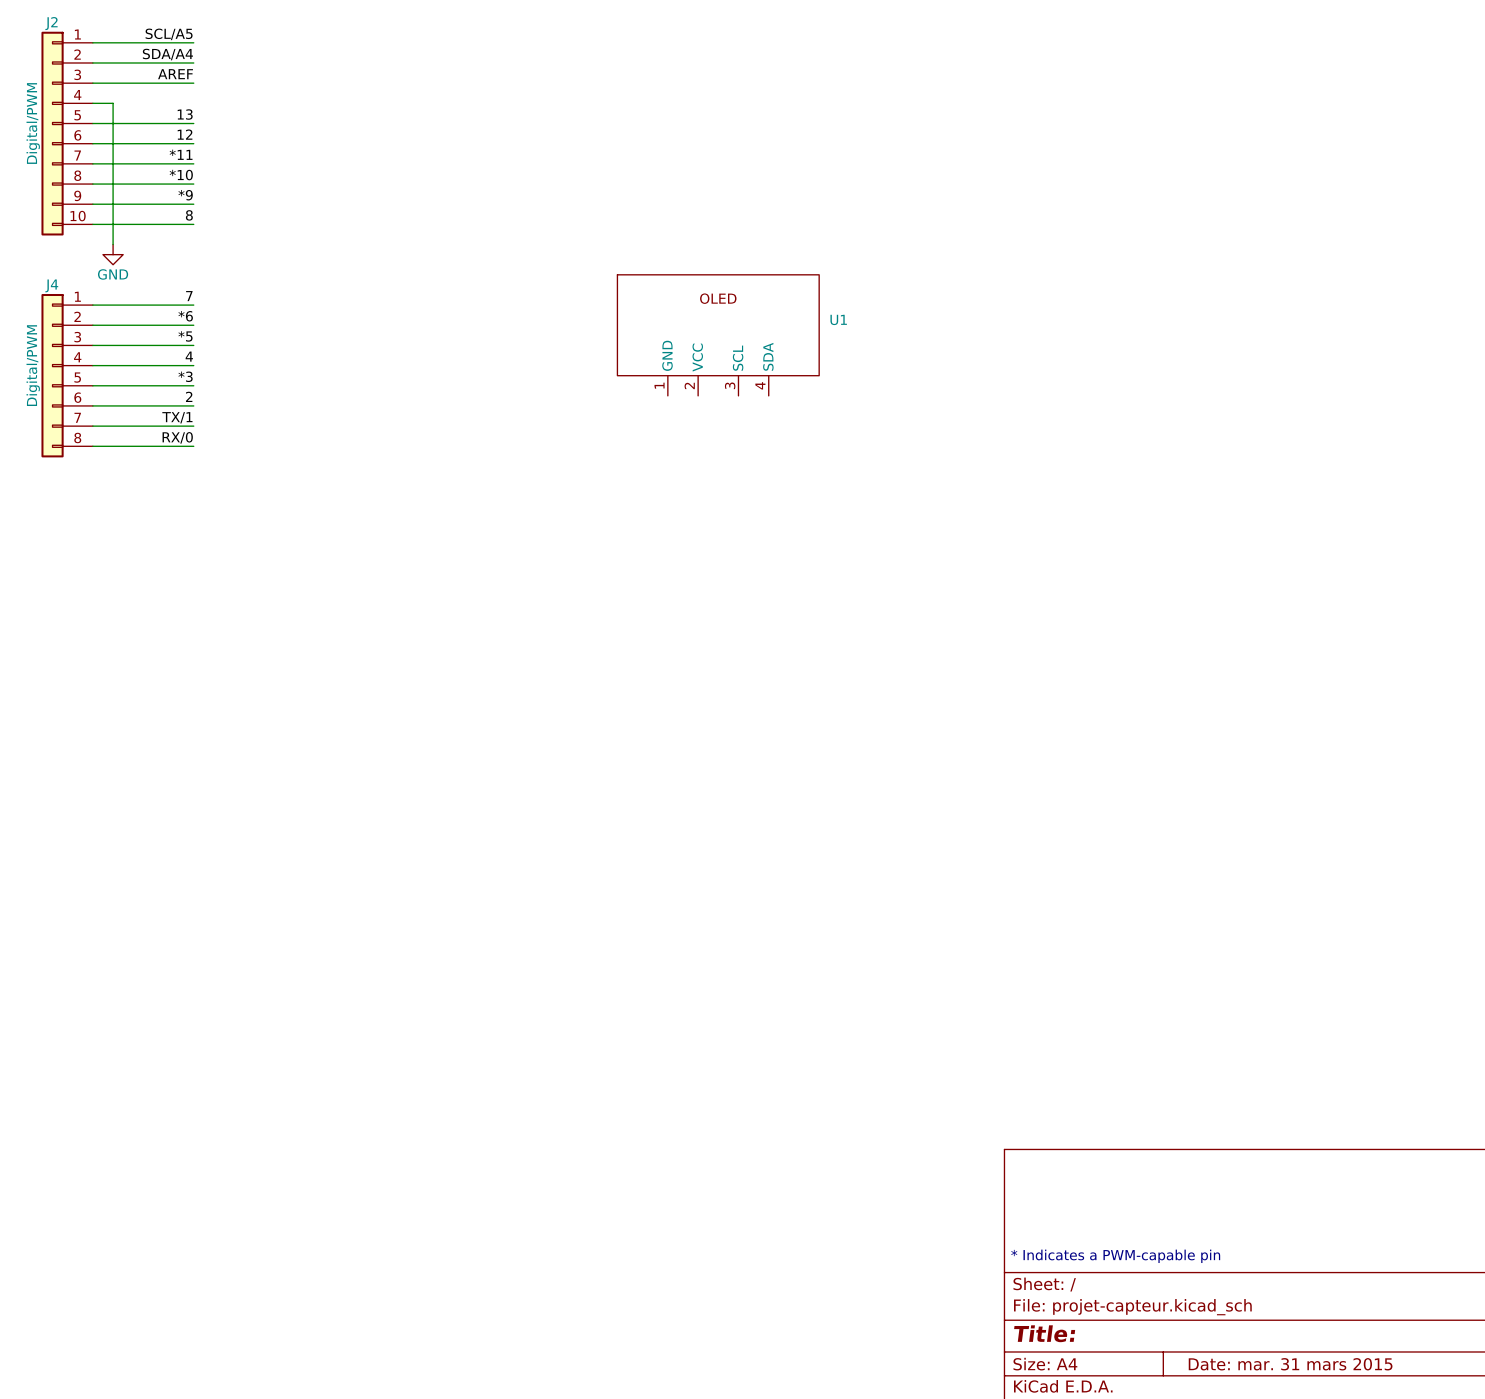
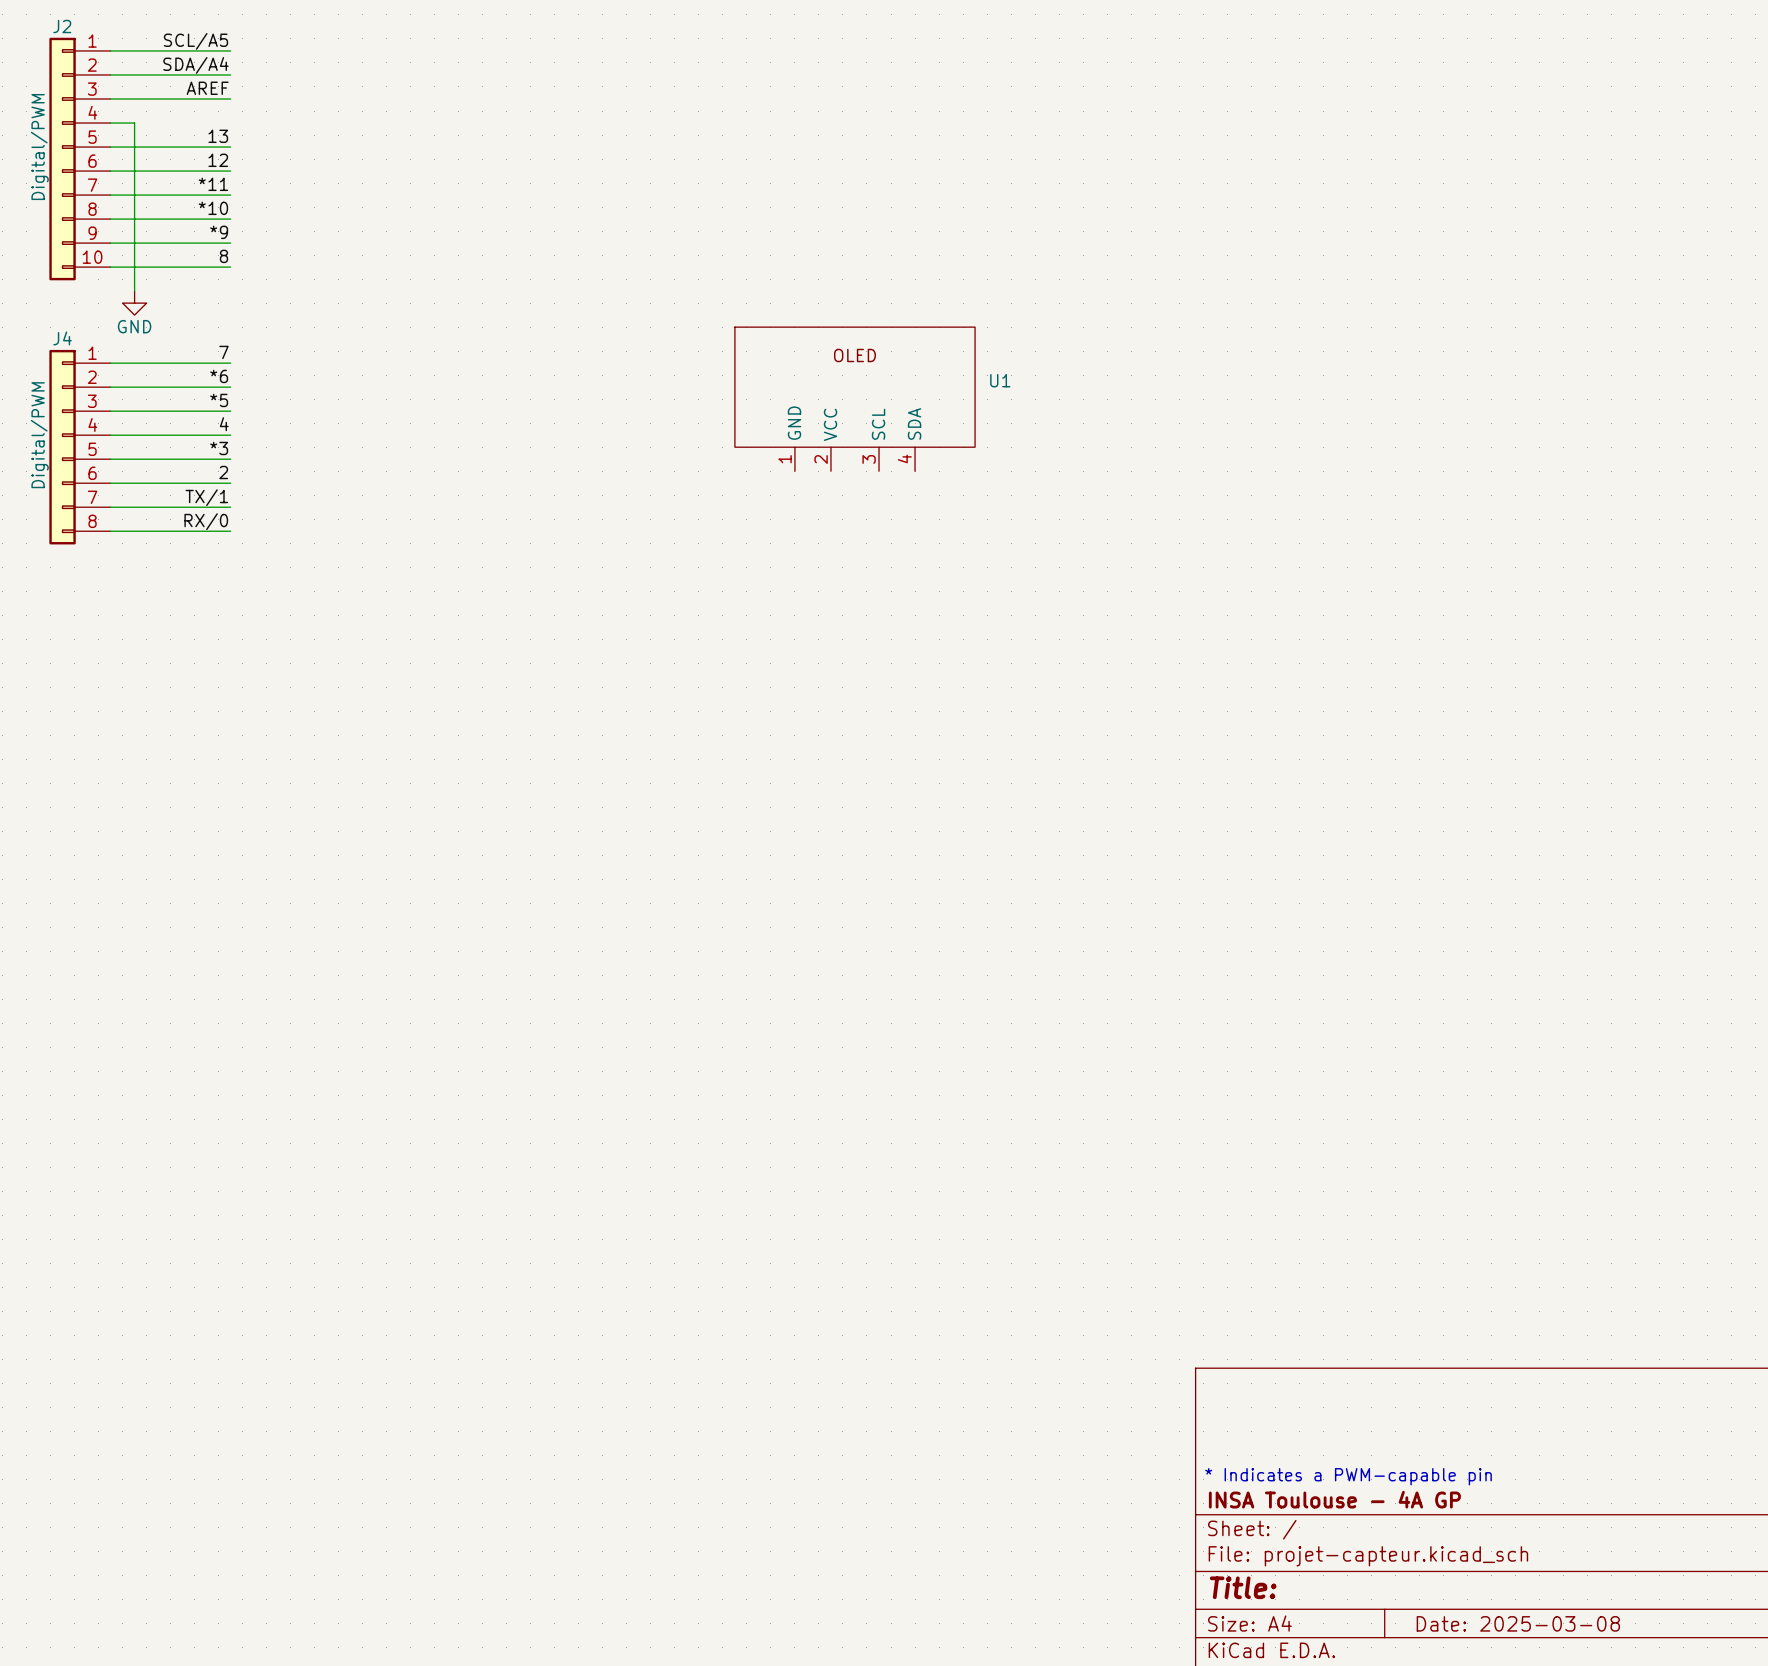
text position: * Indicates a PWM-capable pin (1115, 1256) -> * Indicates a PWM-capable pin (1348, 1476)
title block: none -> INSA Toulouse - 4A GP (1334, 1499)
title block: Date: mar. 31 mars 2015 (1290, 1364) -> Date: 2025-03-08 (1518, 1623)

